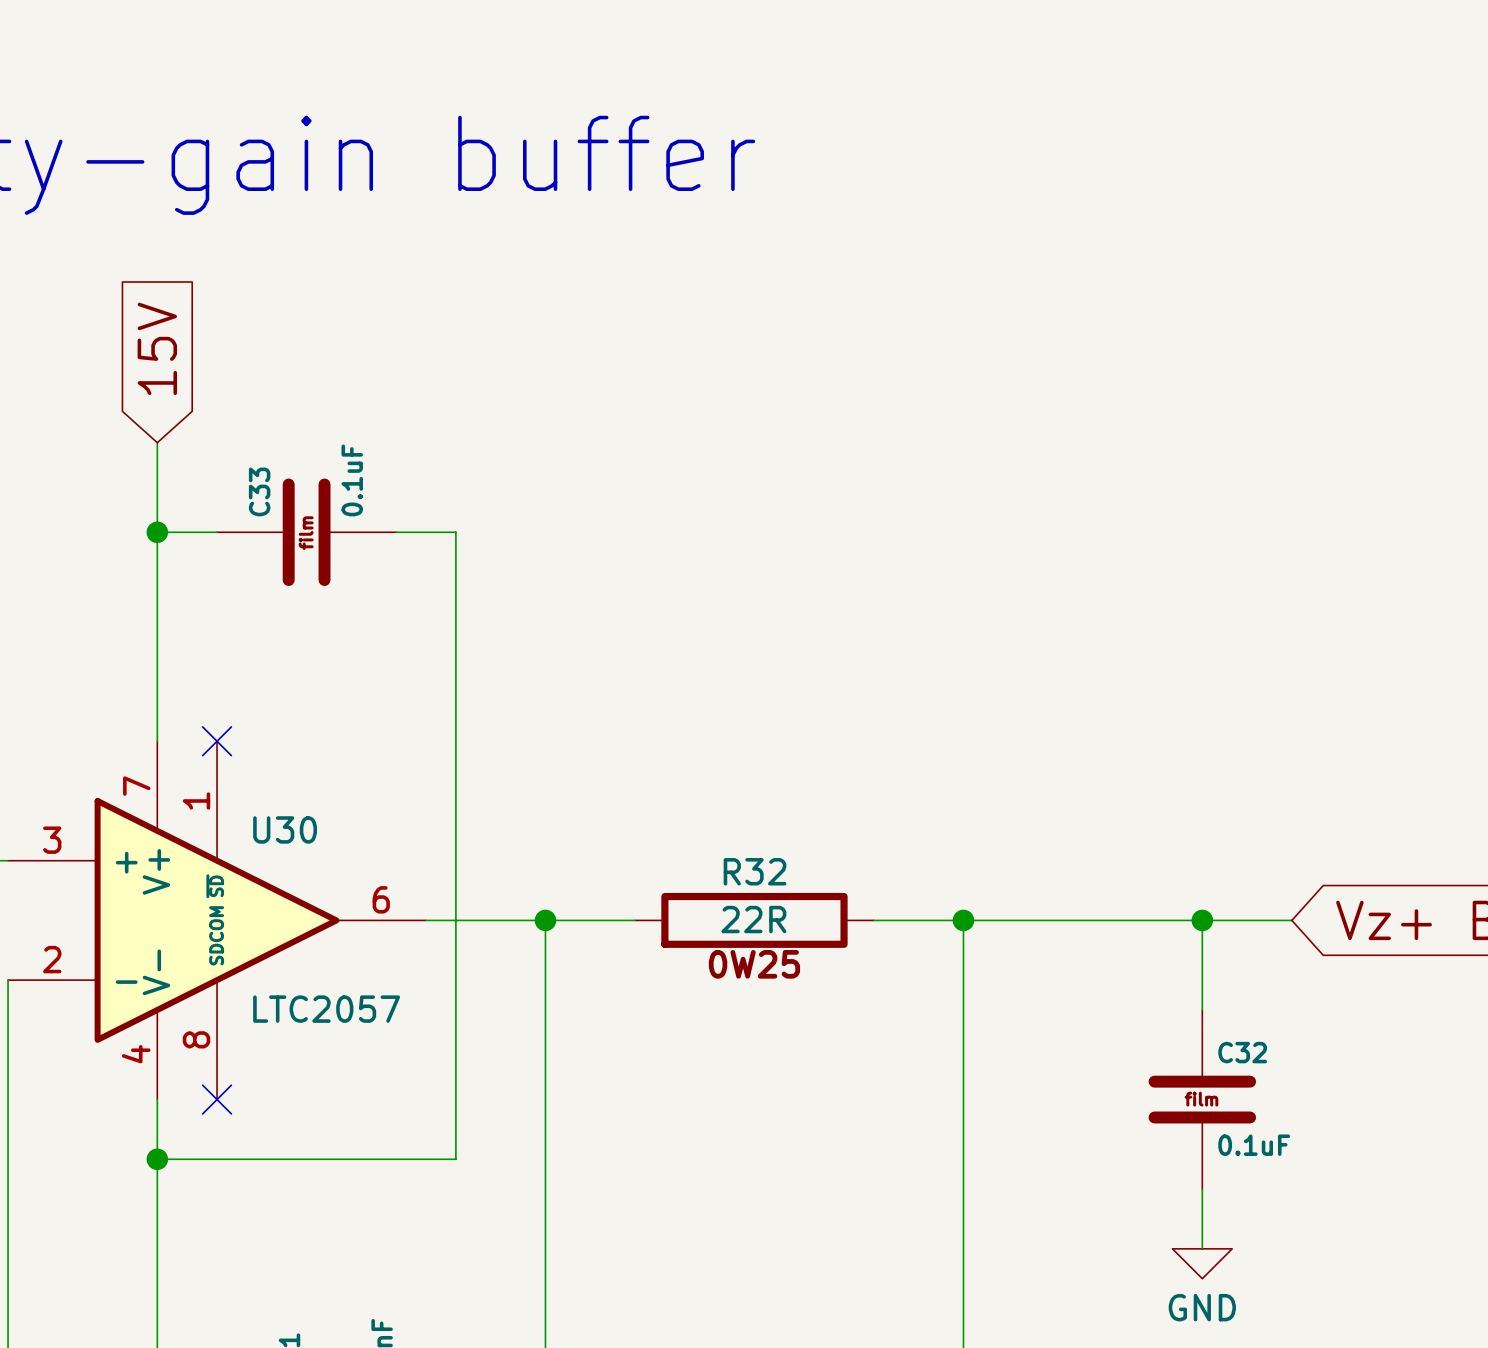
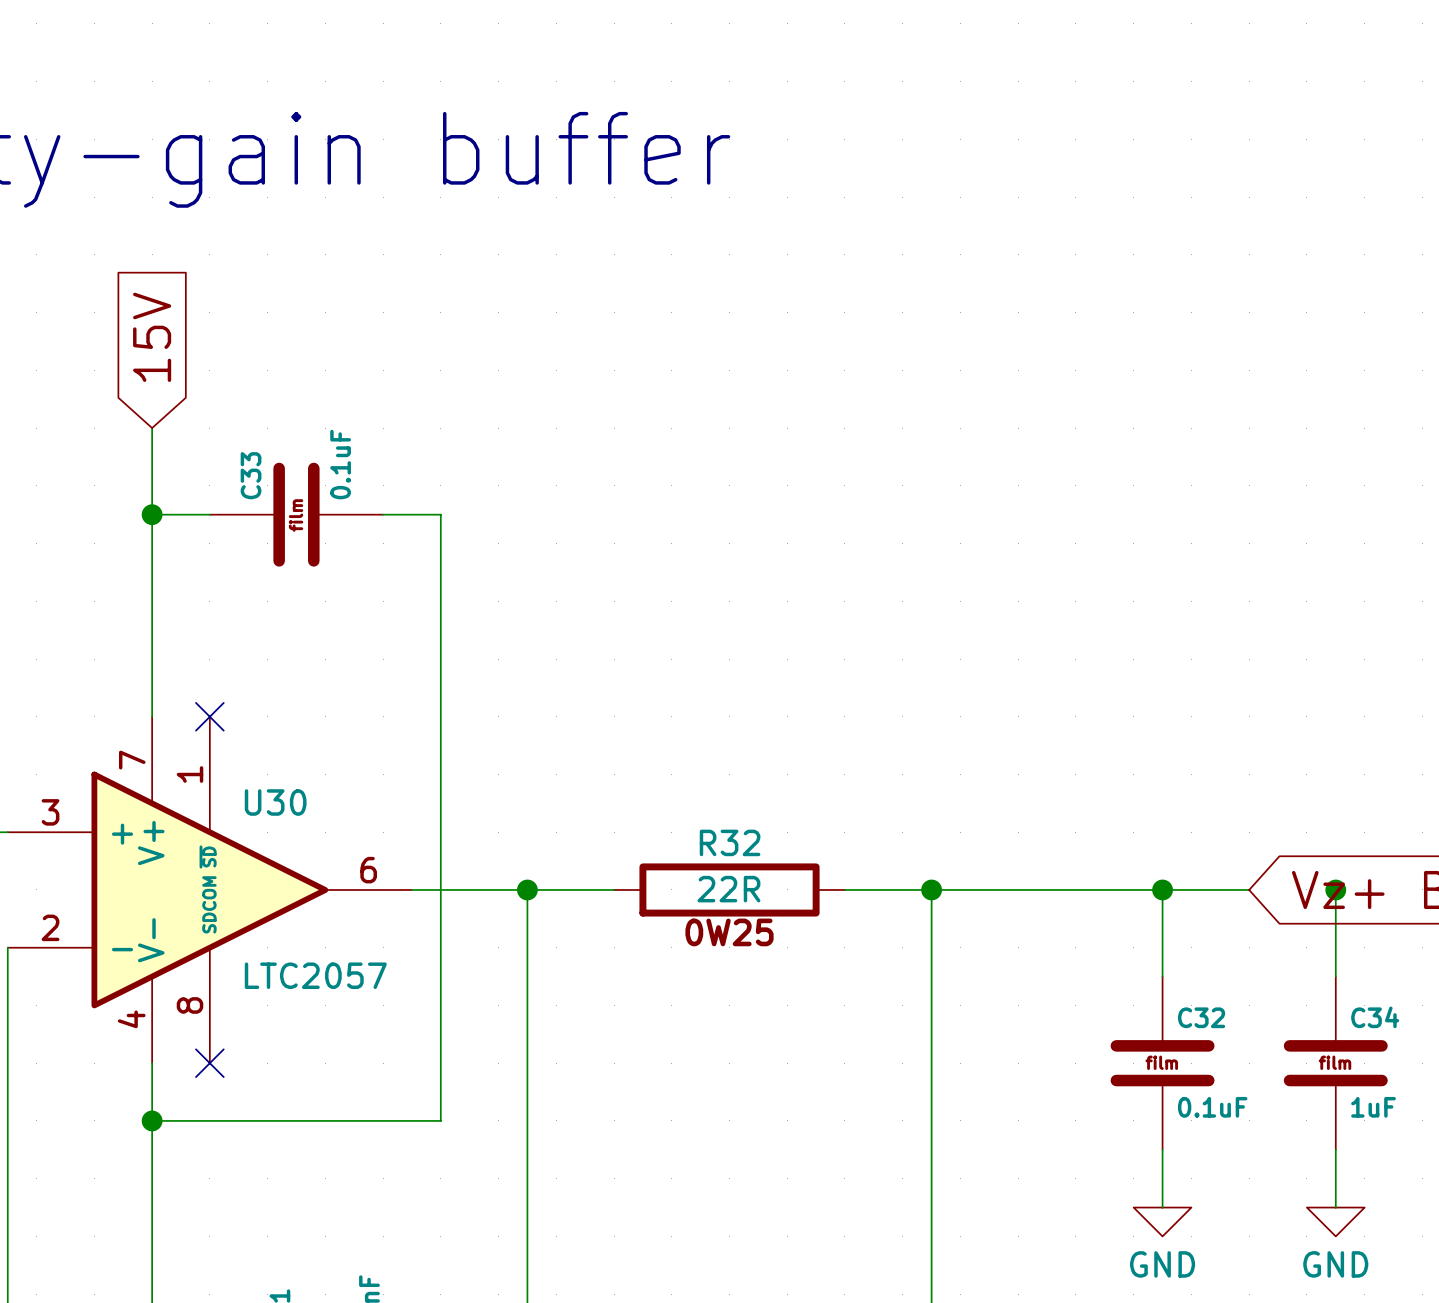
wire: none -> (1335, 889) (1335, 976)
junction: none -> (1335, 889)
C34: none -> 1uF (1335, 1063)
wire: none -> (1335, 1149) (1335, 1207)
power symbol: none -> GND (1335, 1221)

